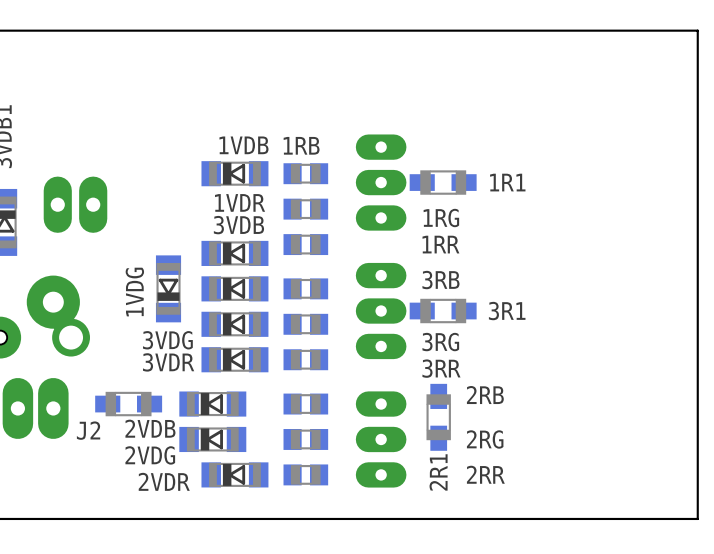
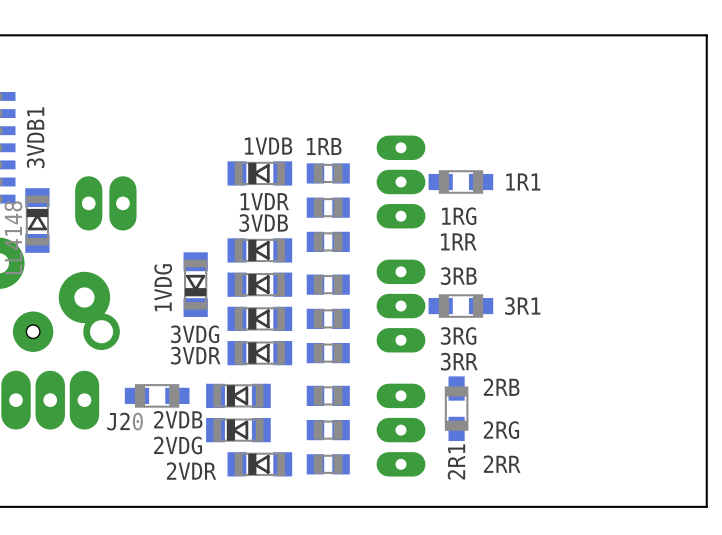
J2 value: none -> 0 (137, 421)

